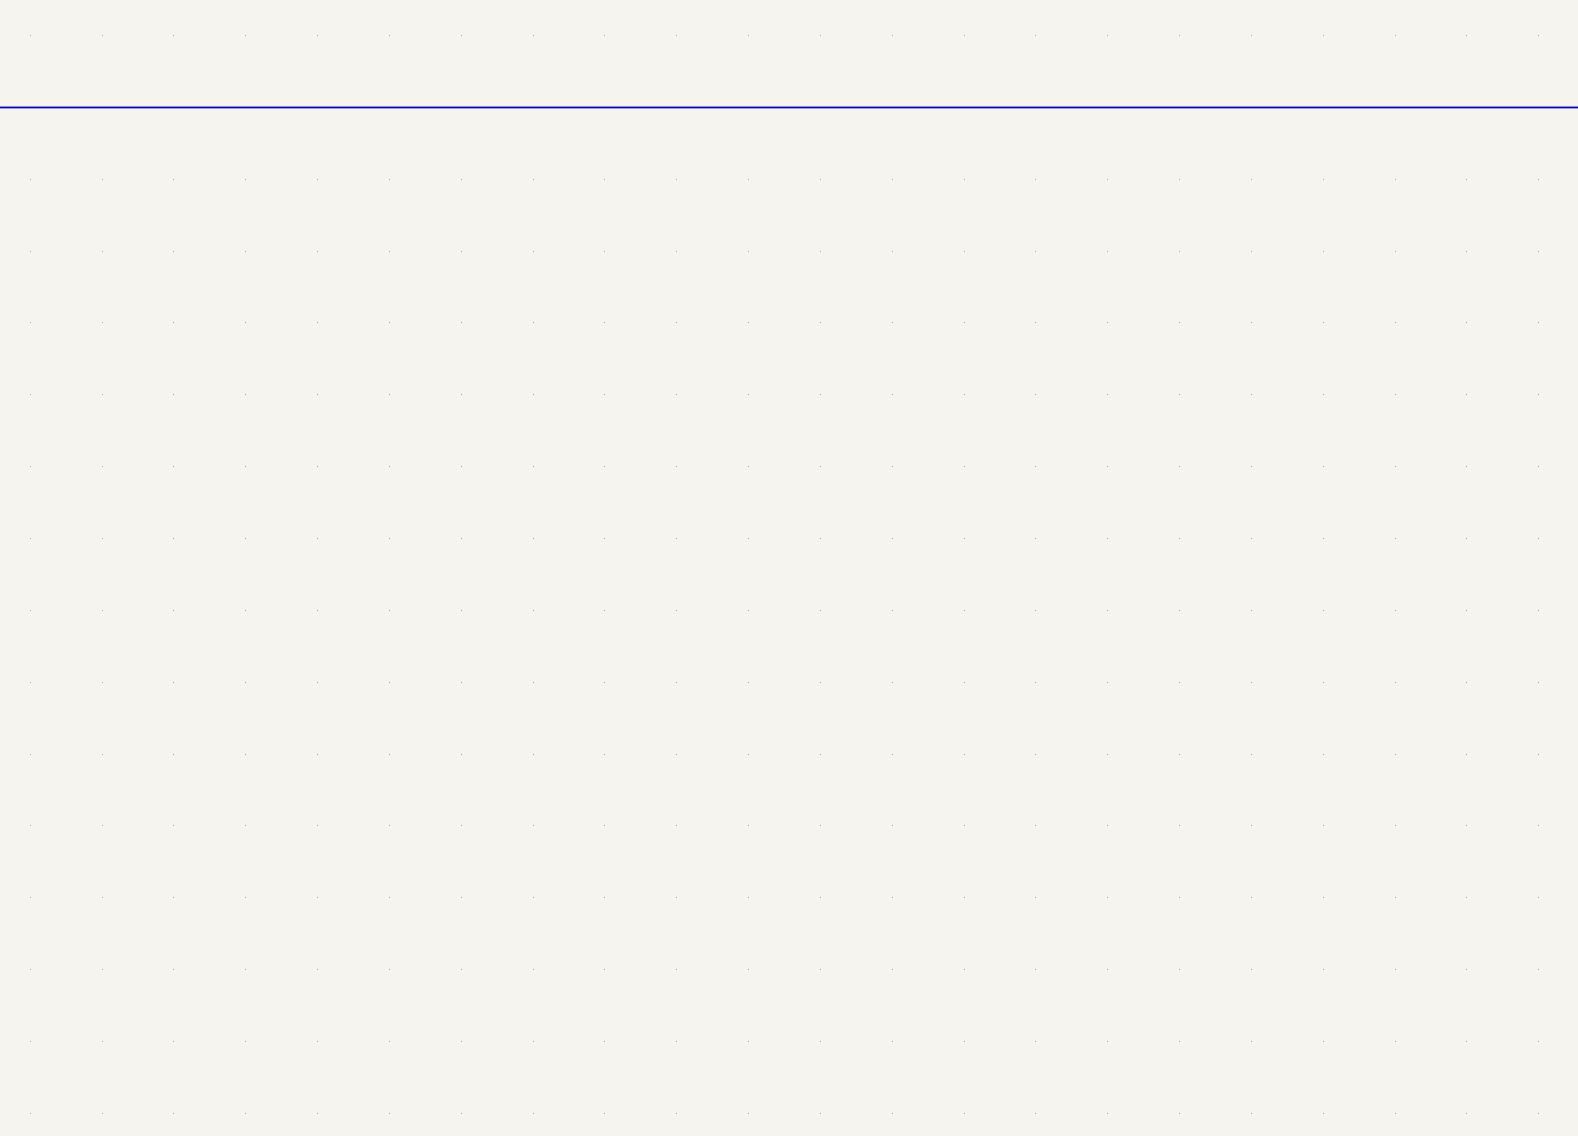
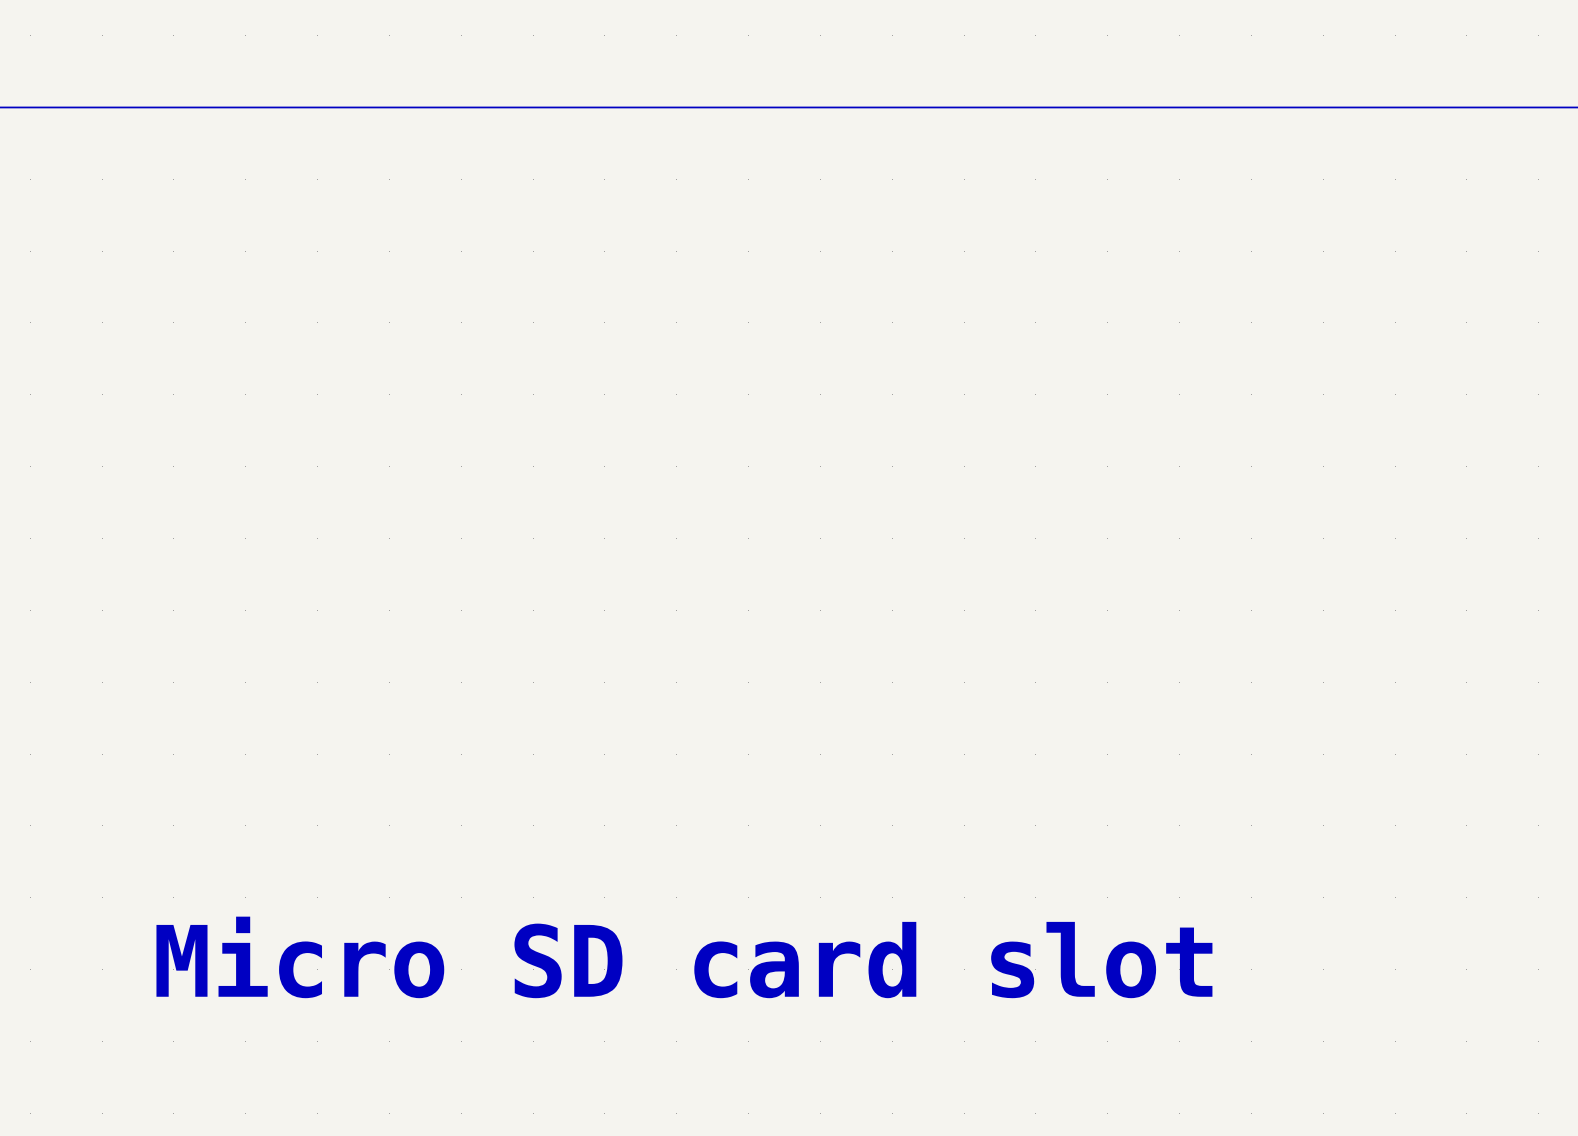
text: none -> Micro SD card slot (684, 957)

